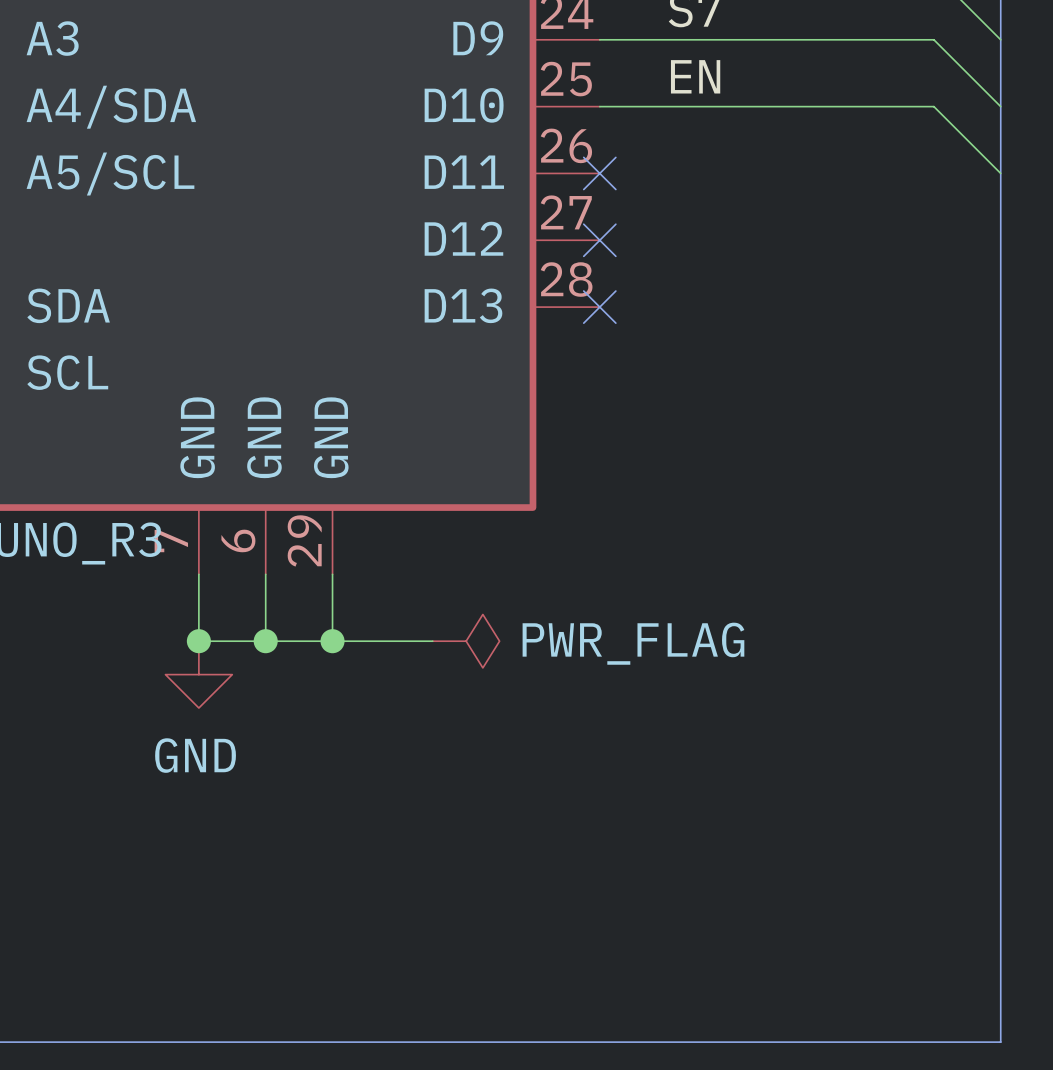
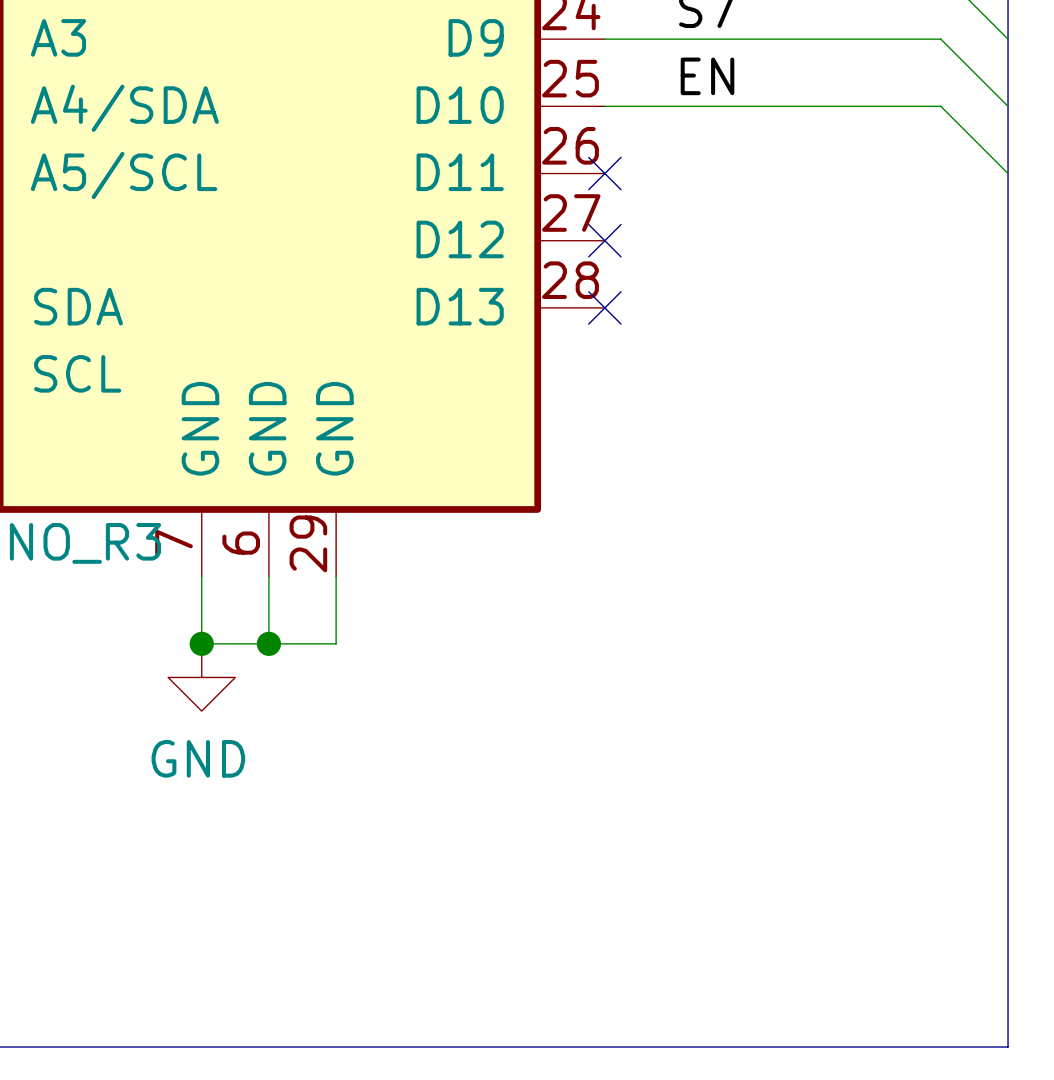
wire: (332, 641) (432, 641) -> none
junction: (332, 641) -> none
power symbol: PWR_FLAG (466, 641) -> none

